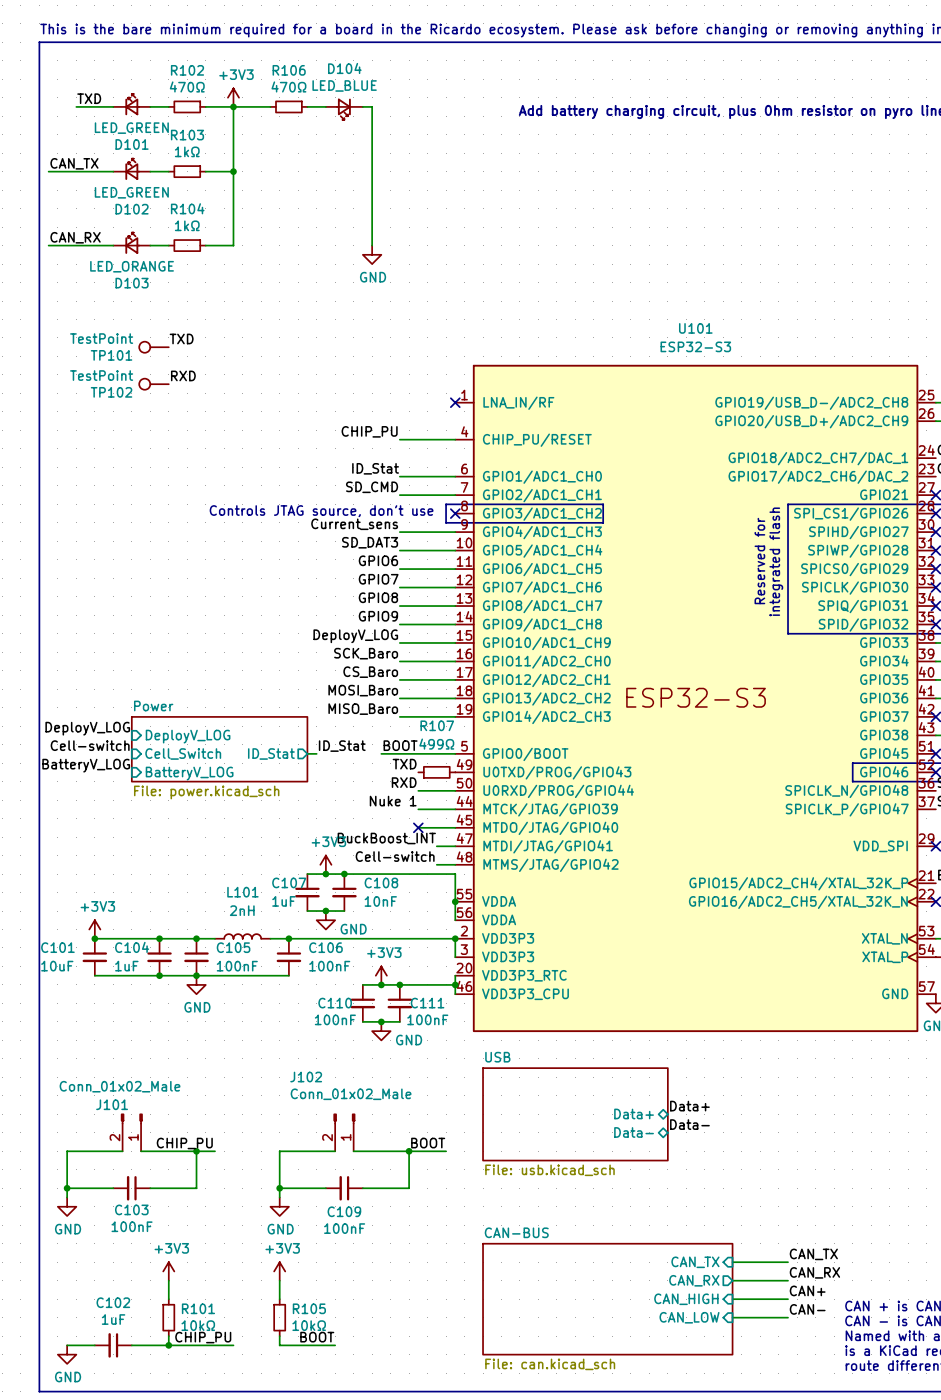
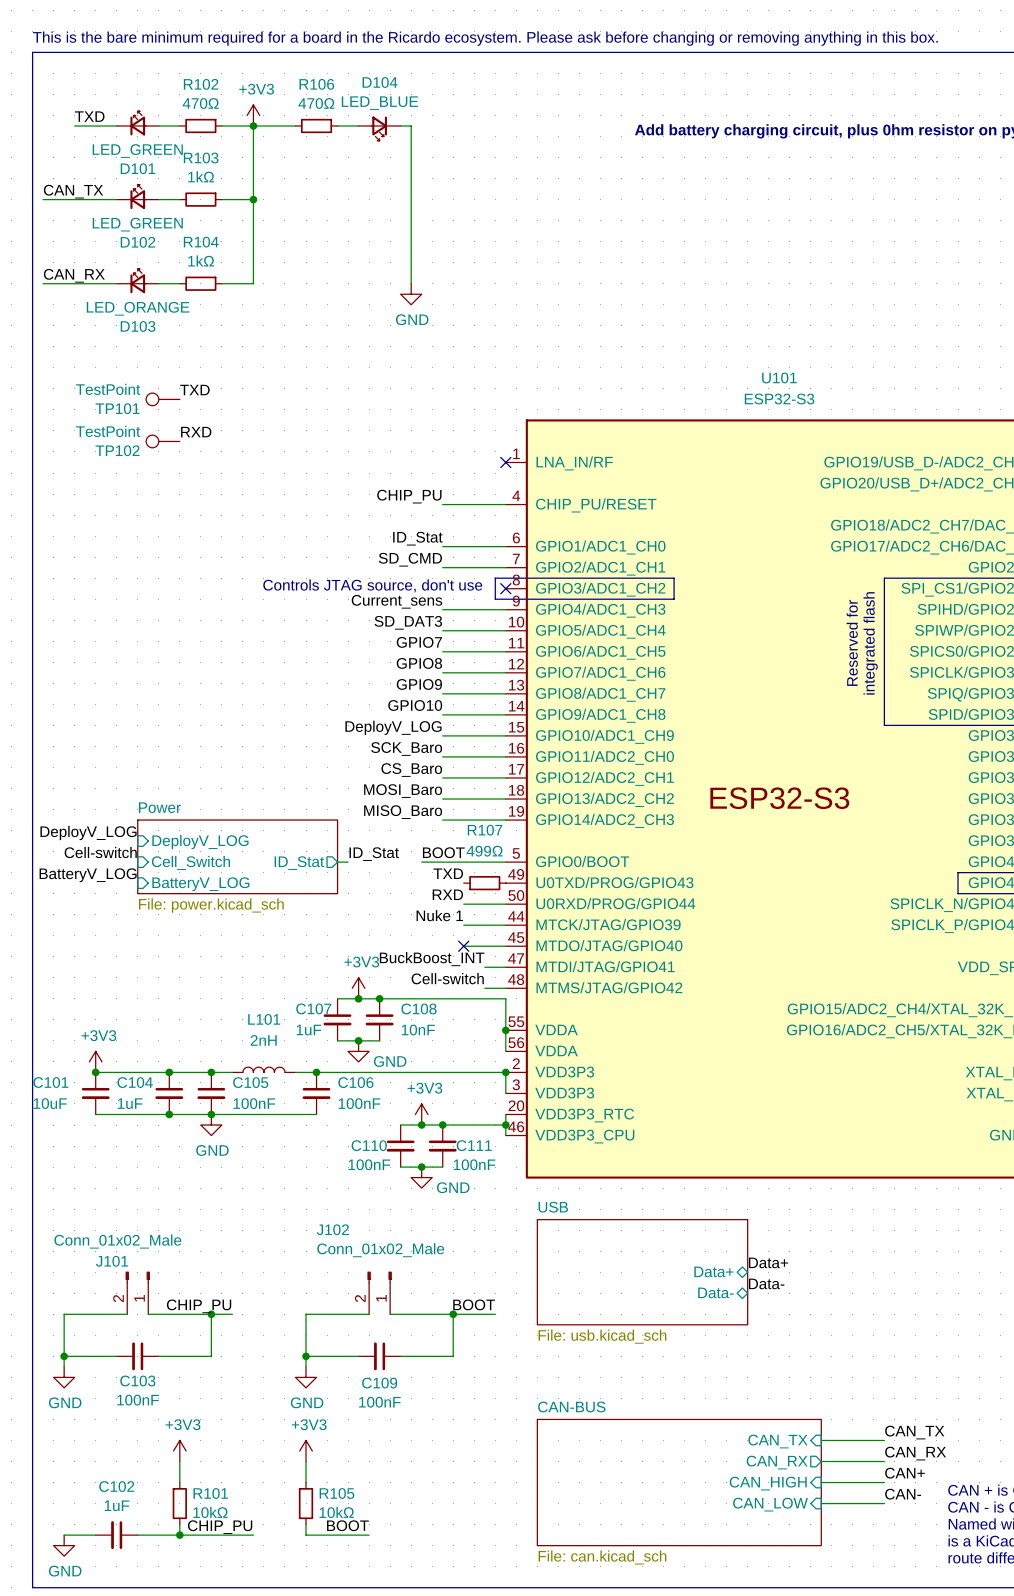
label: GPIO6 (378, 560) -> GPIO7 (419, 642)
label: GPIO7 (378, 579) -> GPIO8 (419, 663)
label: GPIO8 (378, 597) -> GPIO9 (419, 684)
label: GPIO9 (378, 616) -> GPIO10 (415, 705)

